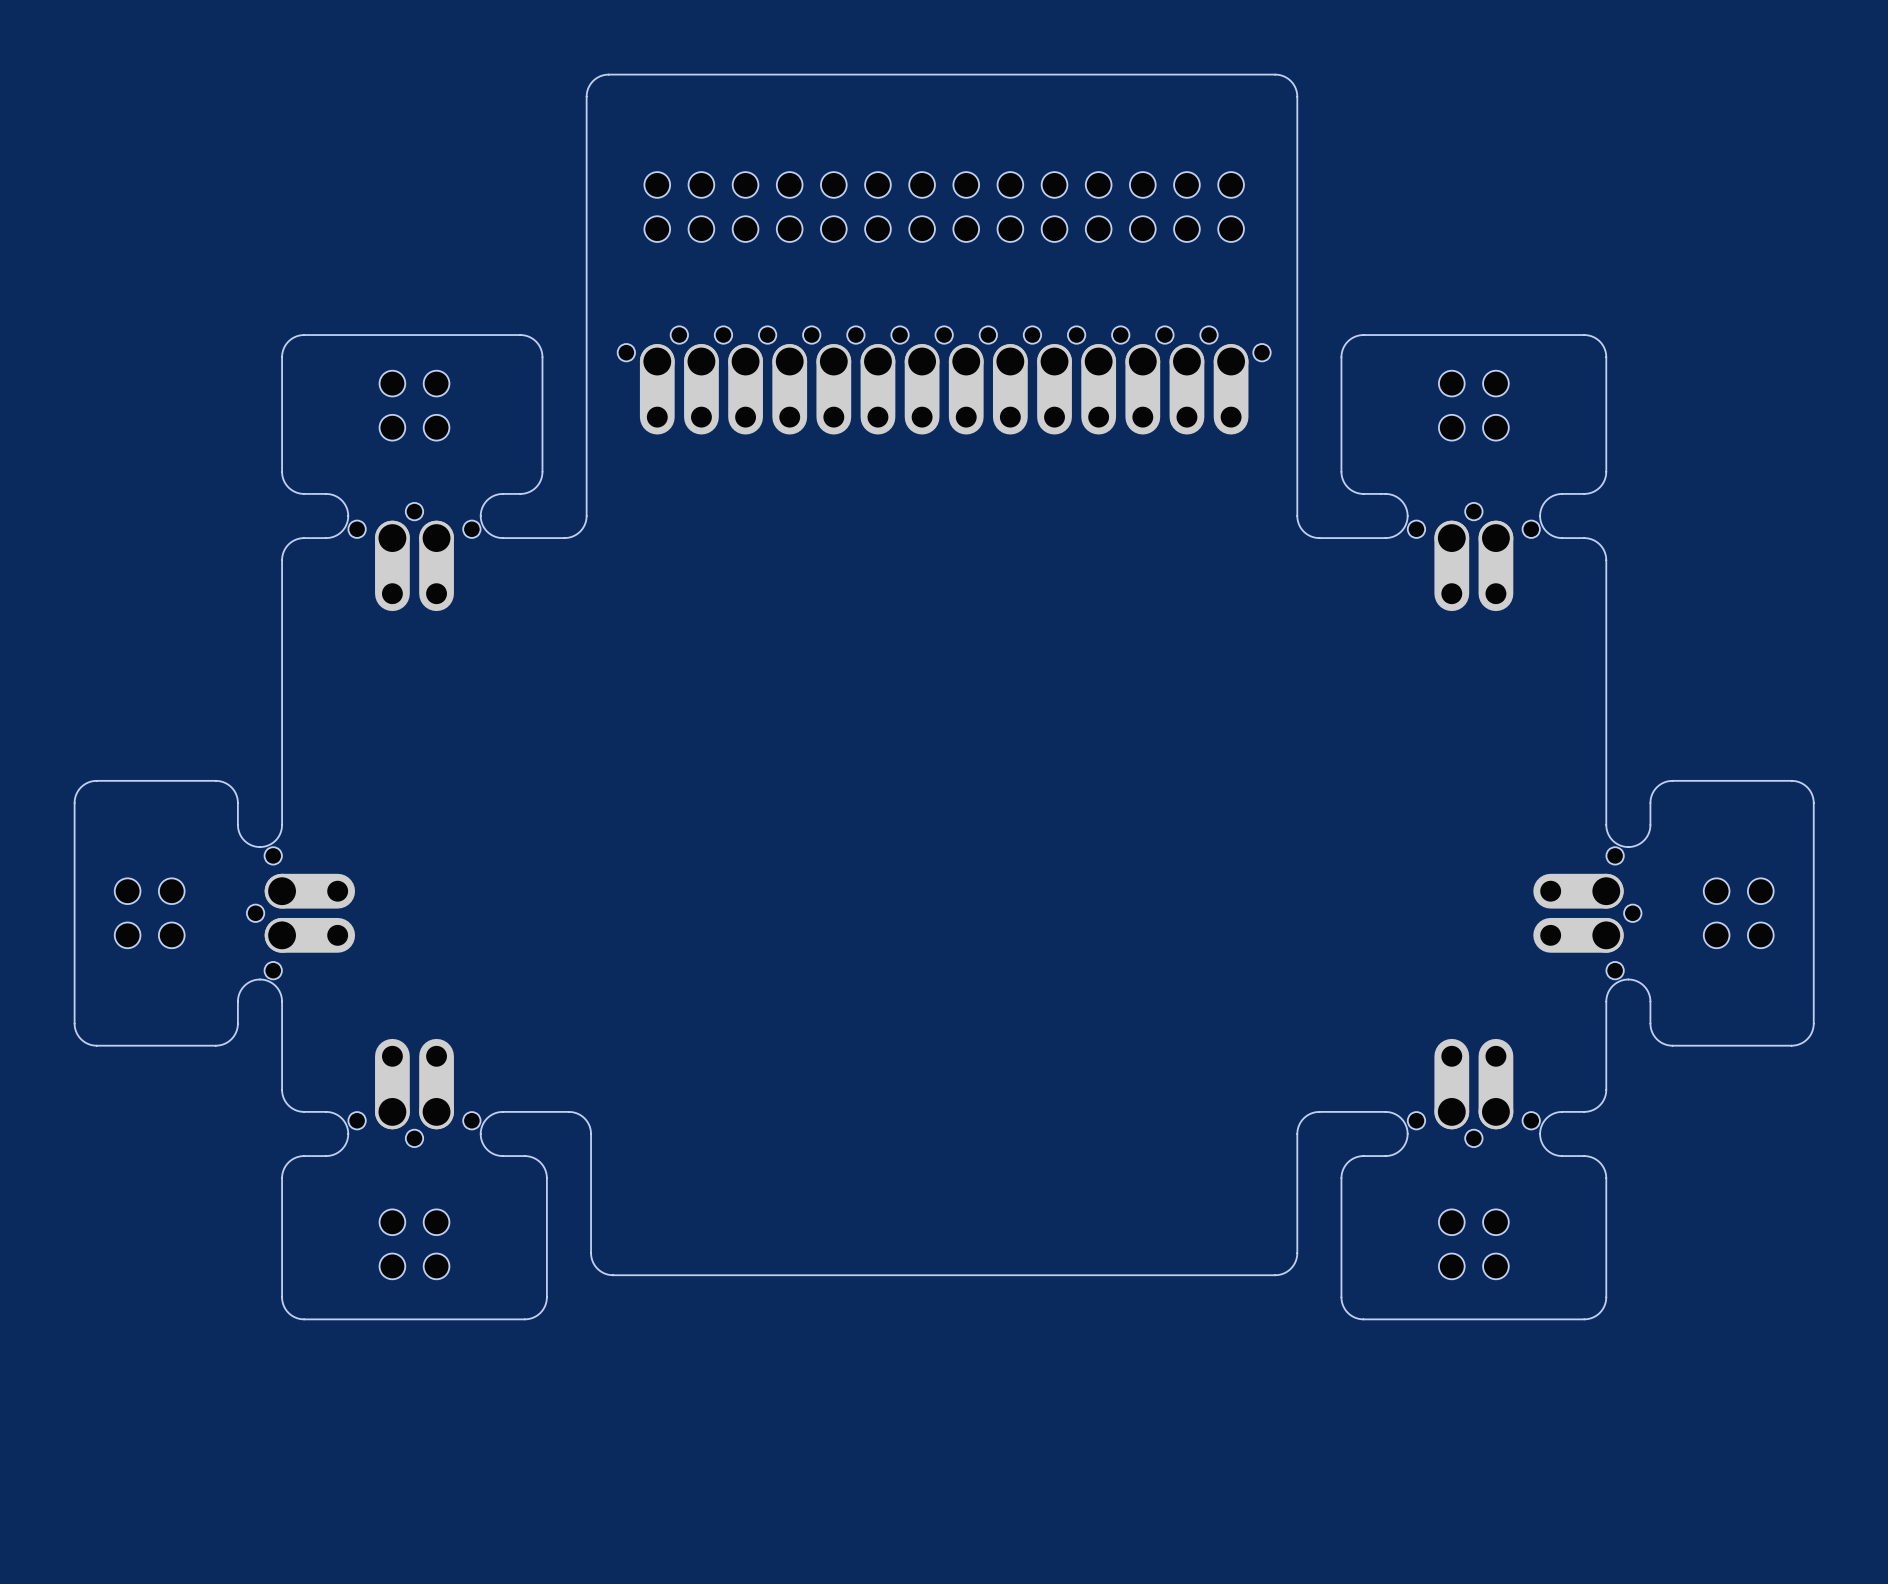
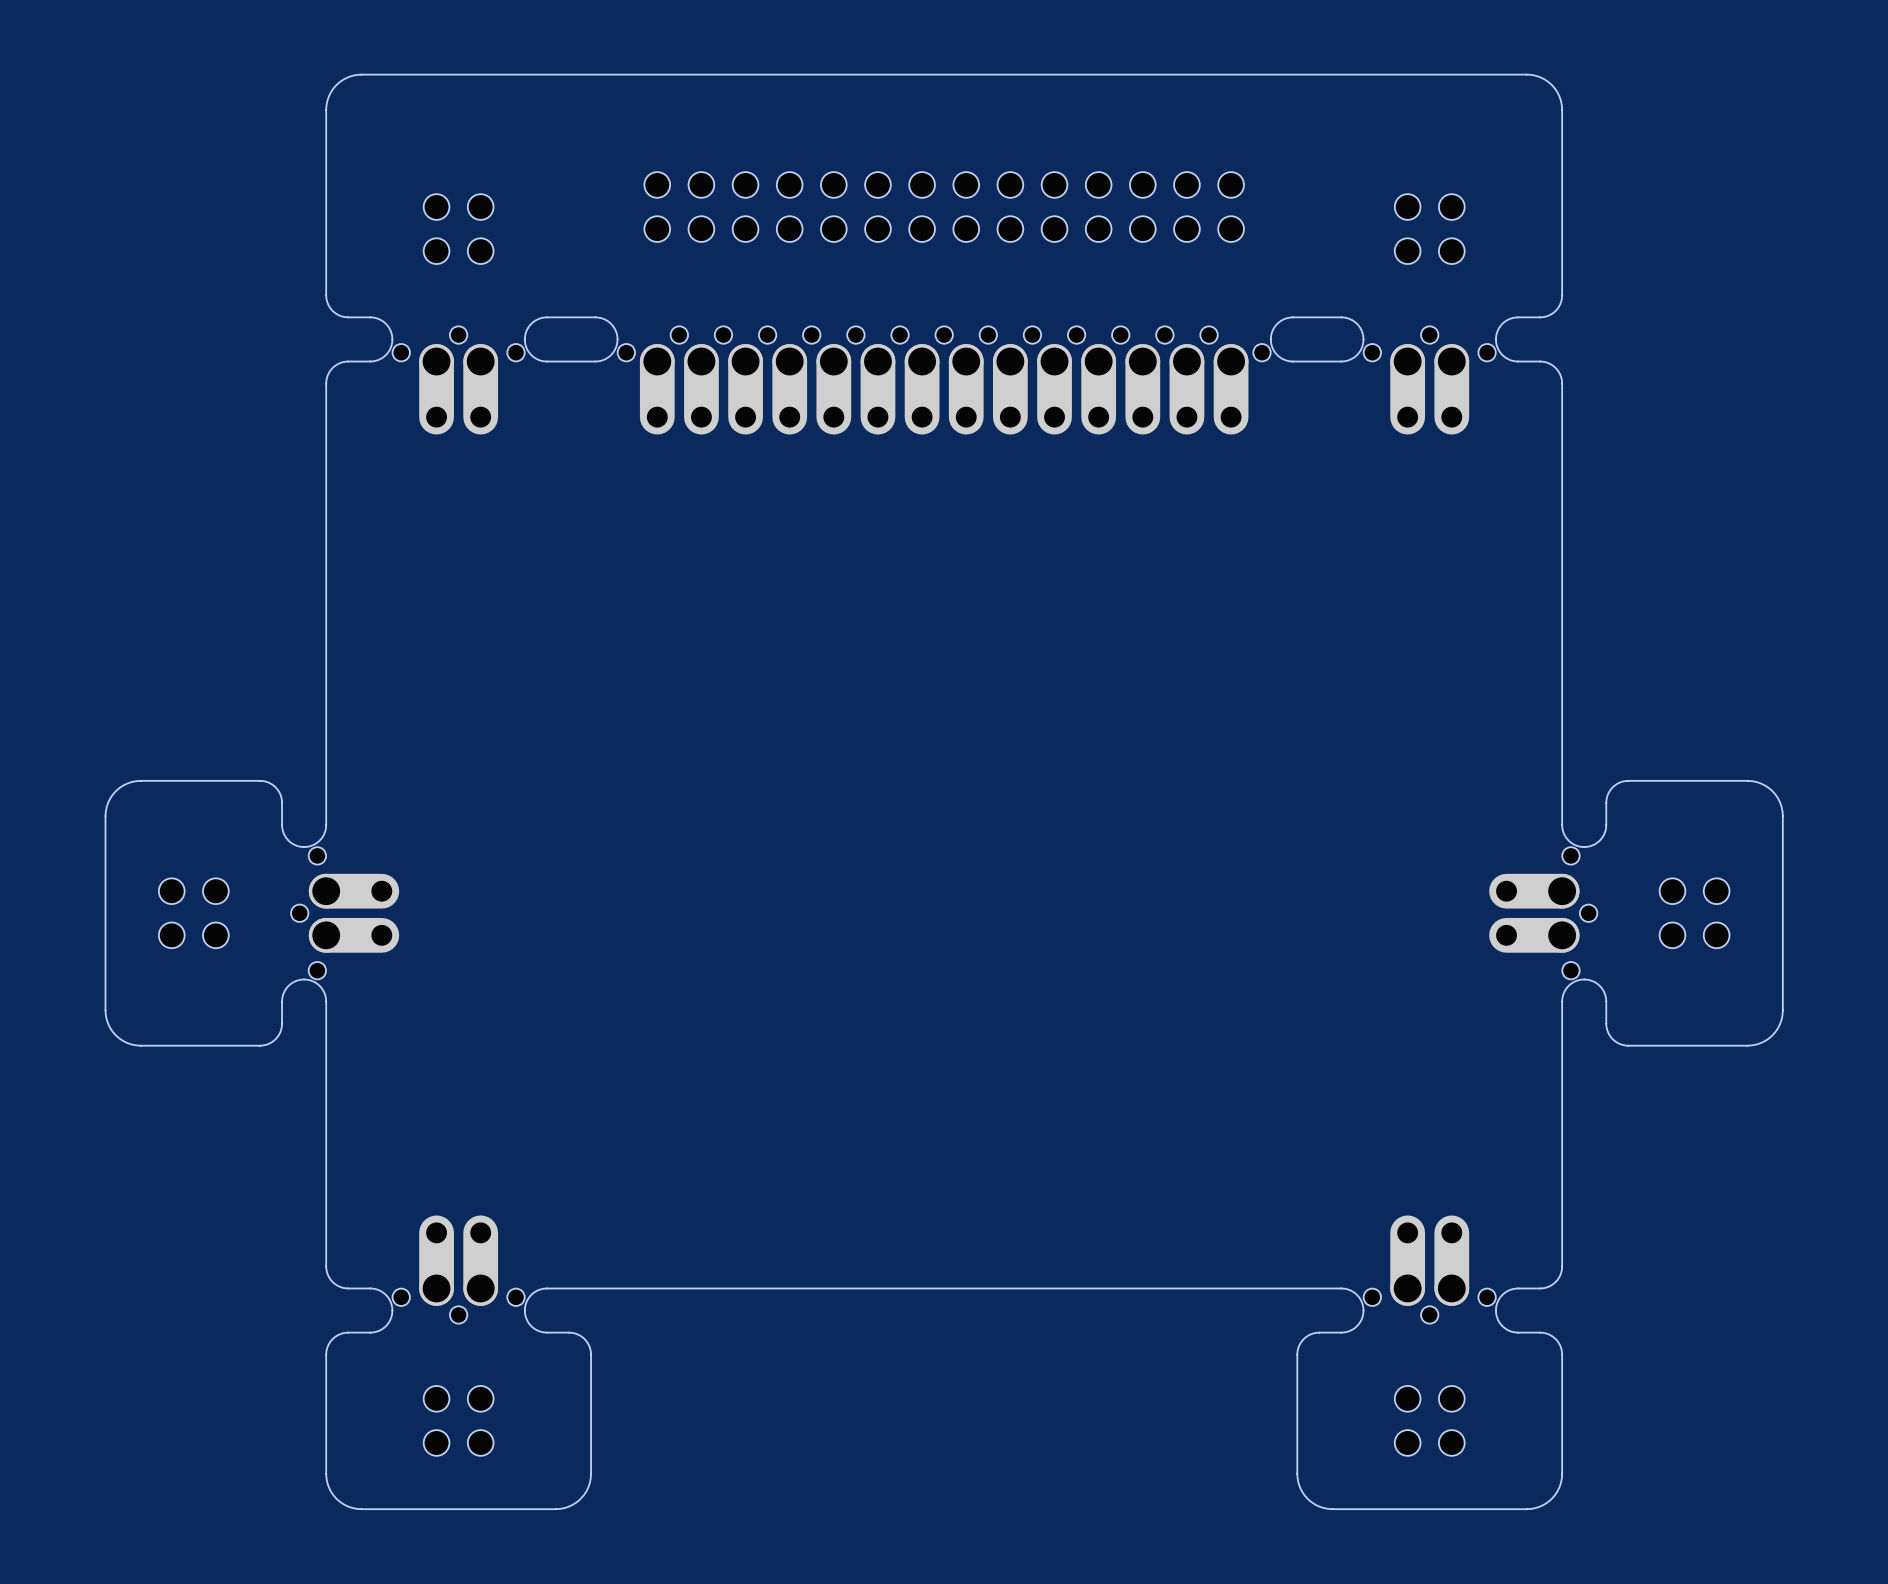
board edge: (608, 74) (601, 75) (593, 81) (586, 94) (586, 516) (584, 525) (578, 533) (567, 537) (500, 537) (487, 531) (481, 520) (481, 508) (489, 498) (497, 494) (530, 491) (537, 485) (541, 476) (542, 354) (539, 345) (532, 338) (520, 335) (304, 335) (292, 338) (284, 347) (282, 357) (283, 479) (288, 487) (296, 492) (328, 494) (337, 497) (344, 504) (348, 516) (346, 525) (337, 534) (328, 537) (296, 539) (288, 544) (282, 555) (282, 802) -> (608, 74) (356, 74) (340, 81) (328, 96) (326, 109) (326, 300) (332, 310) (340, 316) (372, 317) (382, 320) (390, 329) (392, 341) (389, 351) (382, 358) (372, 361) (340, 362) (331, 369) (326, 378) (326, 827) (324, 834) (317, 842) (311, 845) (301, 846) (294, 844) (286, 838) (282, 824)
board edge: (1275, 74) (1284, 76) (1290, 81) (1297, 94) (1297, 516) (1299, 525) (1305, 533) (1316, 537) (1388, 537) (1401, 531) (1407, 520) (1405, 506) (1397, 497) (1388, 494) (1356, 492) (1347, 487) (1342, 479) (1341, 354) (1344, 345) (1351, 338) (1363, 335) (1584, 335) (1595, 338) (1604, 347) (1606, 357) (1605, 479) (1599, 487) (1591, 492) (1559, 494) (1550, 497) (1543, 504) (1540, 516) (1542, 525) (1550, 534) (1559, 537) (1591, 539) (1601, 546) (1605, 555) (1606, 802) -> (1275, 74) (1531, 74) (1548, 81) (1559, 96) (1562, 109) (1561, 300) (1557, 309) (1547, 316) (1515, 317) (1506, 320) (1498, 329) (1496, 341) (1499, 351) (1506, 358) (1515, 361) (1547, 362) (1557, 369) (1561, 378) (1562, 827) (1564, 834) (1570, 842) (1576, 845) (1586, 846) (1599, 840) (1604, 834) (1606, 824)
part: none -> (458, 229)
part: none -> (1429, 229)
board edge: none -> (595, 317) (546, 317) (537, 319) (529, 325) (526, 332) (524, 341) (527, 349) (533, 356) (544, 361) (595, 361) (605, 359) (615, 349) (616, 334) (609, 322) (595, 317)
board edge: none -> (1341, 317) (1292, 317) (1283, 319) (1275, 325) (1272, 332) (1270, 341) (1273, 349) (1279, 356) (1290, 361) (1341, 361) (1351, 359) (1361, 349) (1362, 334) (1355, 322) (1341, 317)
part footprint: [379, 370, 450, 441] -> [419, 344, 454, 435]
part footprint: [1438, 370, 1509, 441] -> [1434, 344, 1470, 435]
part: none -> (480, 389)
part: none -> (1407, 389)
part position: (414, 520) -> (458, 343)
part position: (1473, 520) -> (1429, 343)
part: (392, 565) -> none
part: (436, 565) -> none
part: (1451, 565) -> none
part: (1495, 565) -> none
board edge: (140, 780) (89, 782) (79, 789) (74, 802) (75, 1028) (81, 1039) (91, 1045) (140, 1045) -> (140, 780) (127, 783) (115, 791) (108, 802) (105, 816) (105, 1014) (110, 1028) (115, 1035) (127, 1043) (140, 1045)
board edge: (215, 780) (227, 784) (235, 793) (237, 800) (238, 829) (241, 836) (248, 843) (259, 847) (271, 843) (278, 836) (282, 824) -> (215, 780) (267, 782) (278, 791) (282, 802)
board edge: (1672, 780) (1660, 784) (1652, 793) (1650, 800) (1649, 829) (1645, 838) (1640, 843) (1628, 847) (1616, 843) (1609, 836) (1606, 824) -> (1672, 780) (1621, 782) (1611, 789) (1606, 802)
board edge: (1747, 780) (1798, 782) (1810, 791) (1813, 802) (1813, 1028) (1807, 1039) (1796, 1045) (1747, 1045) -> (1747, 780) (1761, 783) (1772, 791) (1780, 802) (1782, 816) (1782, 1014) (1778, 1028) (1769, 1038) (1761, 1043) (1747, 1045)
part: (309, 891) -> none
part: none -> (354, 891)
part: none -> (1534, 891)
part: (1578, 891) -> none
part position: (149, 913) -> (193, 913)
part position: (264, 913) -> (308, 913)
part position: (1623, 913) -> (1579, 913)
part position: (1738, 913) -> (1694, 913)
part: (309, 935) -> none
part: none -> (354, 935)
part: none -> (1534, 935)
part: (1578, 935) -> none
board edge: (282, 1001) (279, 991) (271, 982) (259, 979) (248, 982) (241, 989) (238, 996) (237, 1026) (235, 1033) (227, 1042) (215, 1045) -> (282, 1023) (277, 1037) (267, 1044) (215, 1045)
board edge: (1606, 1001) (1608, 991) (1616, 982) (1628, 979) (1640, 982) (1645, 987) (1649, 996) (1650, 1026) (1652, 1033) (1660, 1042) (1672, 1045) -> (1606, 1023) (1611, 1037) (1621, 1044) (1672, 1045)
board edge: none -> (1606, 1001) (1601, 987) (1593, 981) (1586, 979) (1576, 980) (1570, 984) (1564, 991) (1562, 999) (1560, 1273) (1555, 1282) (1547, 1287) (1508, 1290) (1500, 1296) (1496, 1308) (1498, 1320) (1506, 1329) (1515, 1332) (1547, 1333) (1557, 1340) (1562, 1352) (1560, 1483) (1554, 1495) (1548, 1501) (1535, 1507) (1526, 1509) (1332, 1509) (1314, 1504) (1304, 1495) (1299, 1487) (1297, 1473) (1297, 1349) (1302, 1340) (1309, 1334) (1316, 1332) (1346, 1332) (1358, 1324) (1363, 1313) (1361, 1300) (1353, 1291) (1341, 1288) (541, 1289) (531, 1294) (526, 1303) (525, 1315) (529, 1324) (541, 1332) (571, 1332) (578, 1334) (586, 1340) (590, 1349) (590, 1478) (586, 1491) (580, 1498) (569, 1506) (555, 1509) (361, 1509) (348, 1506) (333, 1495) (326, 1478) (326, 1349) (331, 1340) (340, 1333) (372, 1332) (382, 1329) (390, 1320) (392, 1308) (389, 1298) (379, 1290) (340, 1287) (332, 1282) (327, 1273) (326, 999) (324, 991) (317, 984) (311, 980) (301, 979) (292, 982) (286, 987) (282, 1001)
board edge: (1606, 1023) (1606, 1089) (1602, 1101) (1597, 1107) (1589, 1111) (1559, 1112) (1552, 1114) (1544, 1120) (1540, 1131) (1542, 1143) (1550, 1152) (1559, 1155) (1591, 1157) (1599, 1162) (1605, 1173) (1606, 1299) (1602, 1309) (1597, 1314) (1584, 1319) (1363, 1319) (1356, 1318) (1347, 1312) (1342, 1304) (1341, 1297) (1341, 1173) (1346, 1164) (1353, 1158) (1361, 1156) (1390, 1155) (1402, 1147) (1407, 1136) (1405, 1124) (1397, 1115) (1385, 1111) (1316, 1112) (1307, 1115) (1300, 1122) (1297, 1133) (1297, 1255) (1295, 1262) (1288, 1270) (1275, 1275) (608, 1274) (597, 1268) (591, 1255) (591, 1133) (587, 1122) (580, 1115) (571, 1112) (497, 1112) (487, 1118) (481, 1126) (481, 1138) (485, 1147) (497, 1155) (527, 1156) (534, 1158) (542, 1164) (546, 1173) (546, 1297) (545, 1304) (540, 1312) (534, 1317) (524, 1319) (299, 1318) (288, 1312) (282, 1299) (282, 1173) (288, 1162) (296, 1157) (328, 1155) (337, 1152) (346, 1143) (348, 1131) (344, 1122) (335, 1114) (328, 1112) (299, 1111) (290, 1107) (285, 1101) (282, 1089) (282, 1023) -> none
part: (392, 1084) -> none
part: (436, 1084) -> none
part: (1451, 1084) -> none
part: (1495, 1084) -> none
part: (414, 1129) -> none
part: (1473, 1129) -> none
part footprint: [379, 1209, 450, 1280] -> [419, 1215, 454, 1306]
part footprint: [1438, 1209, 1509, 1280] -> [1434, 1215, 1470, 1306]
part: none -> (480, 1260)
part: none -> (1407, 1260)
part: none -> (458, 1306)
part: none -> (1429, 1306)
part: none -> (458, 1420)
part: none -> (1429, 1420)

